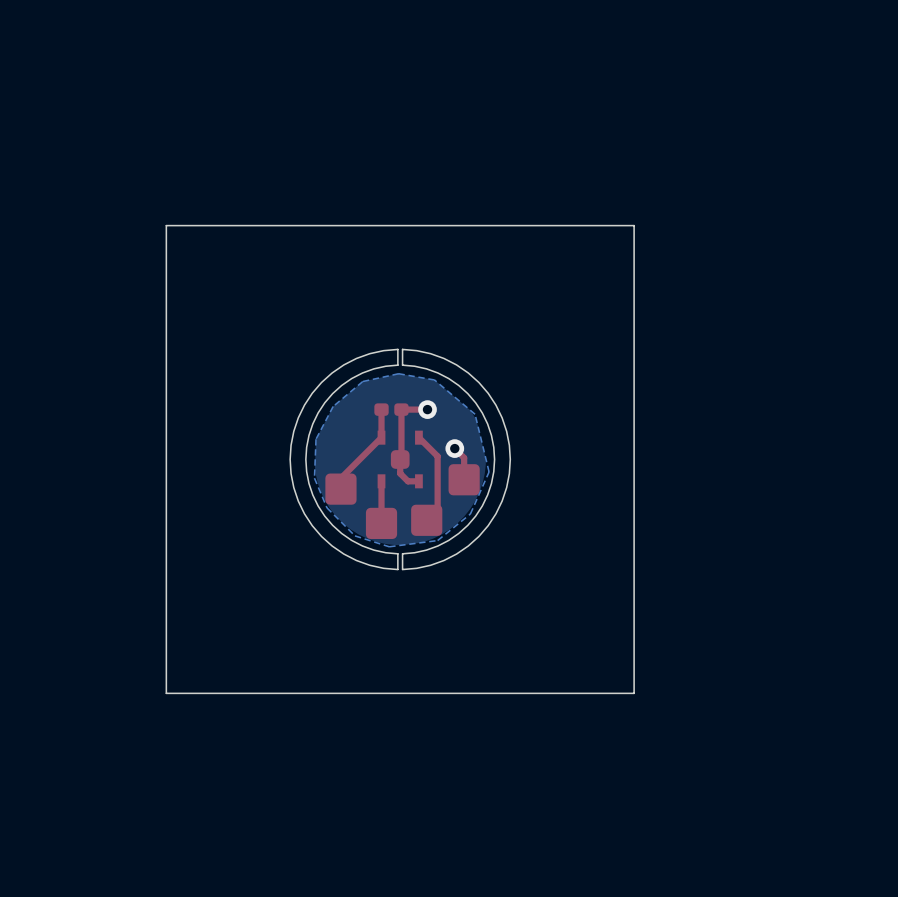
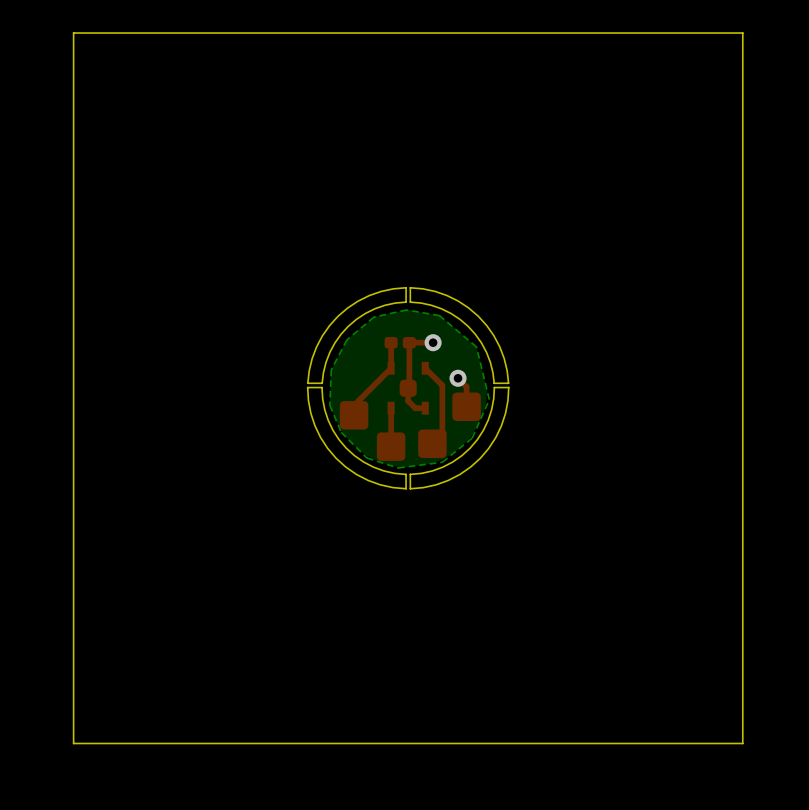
board edge: none -> (742, 33) (73, 33) (73, 743) (742, 743) (742, 33)
board edge: (634, 225) (166, 225) (166, 693) (634, 693) (634, 225) -> none
board edge: (402, 349) (430, 353) (443, 358) (468, 372) (478, 382) (488, 393) (502, 417) (506, 431) (510, 459) (509, 473) (502, 501) (488, 525) (478, 536) (456, 554) (443, 560) (430, 565) (402, 569) -> (410, 474) (442, 467) (461, 455) (477, 439) (488, 420) (494, 387) (508, 387) (507, 400) (501, 425) (488, 448) (480, 458) (459, 474) (448, 480) (436, 484) (410, 488)
board edge: none -> (406, 302) (384, 305) (356, 319) (341, 334) (329, 352) (322, 383) (307, 383) (309, 370) (316, 346) (329, 325) (347, 308) (369, 295) (393, 288) (406, 287) (406, 302)
board edge: (402, 365) (426, 368) (437, 373) (448, 378) (467, 393) (475, 402) (487, 423) (491, 435) (494, 459) (491, 483) (487, 495) (475, 516) (467, 525) (458, 533) (437, 545) (414, 552) (402, 553) -> (410, 302) (431, 305) (459, 319) (475, 334) (486, 352) (494, 383) (508, 383) (504, 358) (499, 346) (493, 335) (478, 316) (468, 308) (446, 295) (422, 288) (410, 287)
board edge: (397, 569) (397, 553) (385, 552) (362, 545) (341, 533) (324, 516) (312, 495) (306, 471) (305, 459) (308, 435) (318, 412) (324, 402) (341, 385) (362, 373) (373, 368) (397, 365) (397, 349) (383, 350) (356, 358) (343, 364) (321, 382) (304, 405) (298, 417) (293, 431) (290, 459) (293, 487) (298, 501) (312, 525) (321, 536) (332, 545) (356, 560) (383, 568) (397, 569) -> (406, 474) (406, 488) (393, 487) (368, 480) (345, 467) (336, 458) (320, 437) (310, 413) (307, 387) (322, 387) (328, 420) (339, 439) (354, 455) (373, 467) (406, 474)

